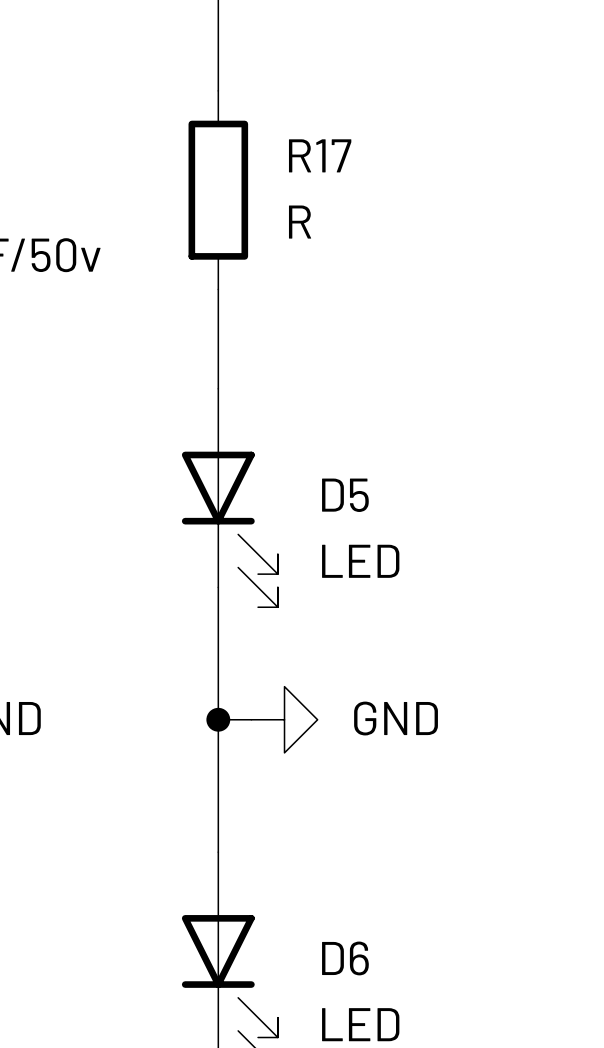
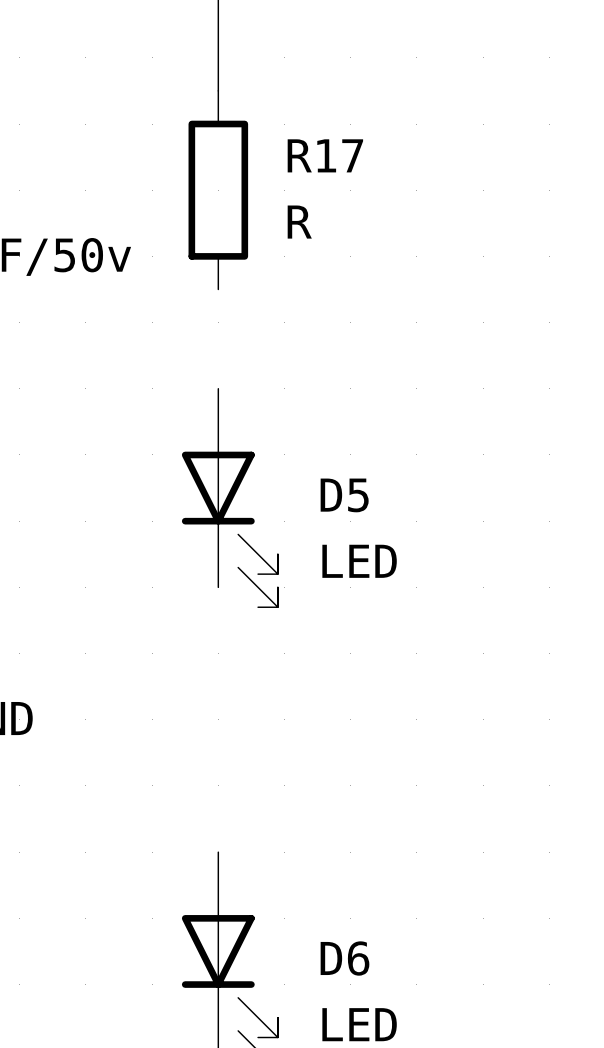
wire: (218, 289) (218, 388) -> none
wire: (218, 587) (218, 852) -> none
wire: (218, 719) (251, 719) -> none
junction: (218, 719) -> none
power symbol: GND (284, 719) -> none

